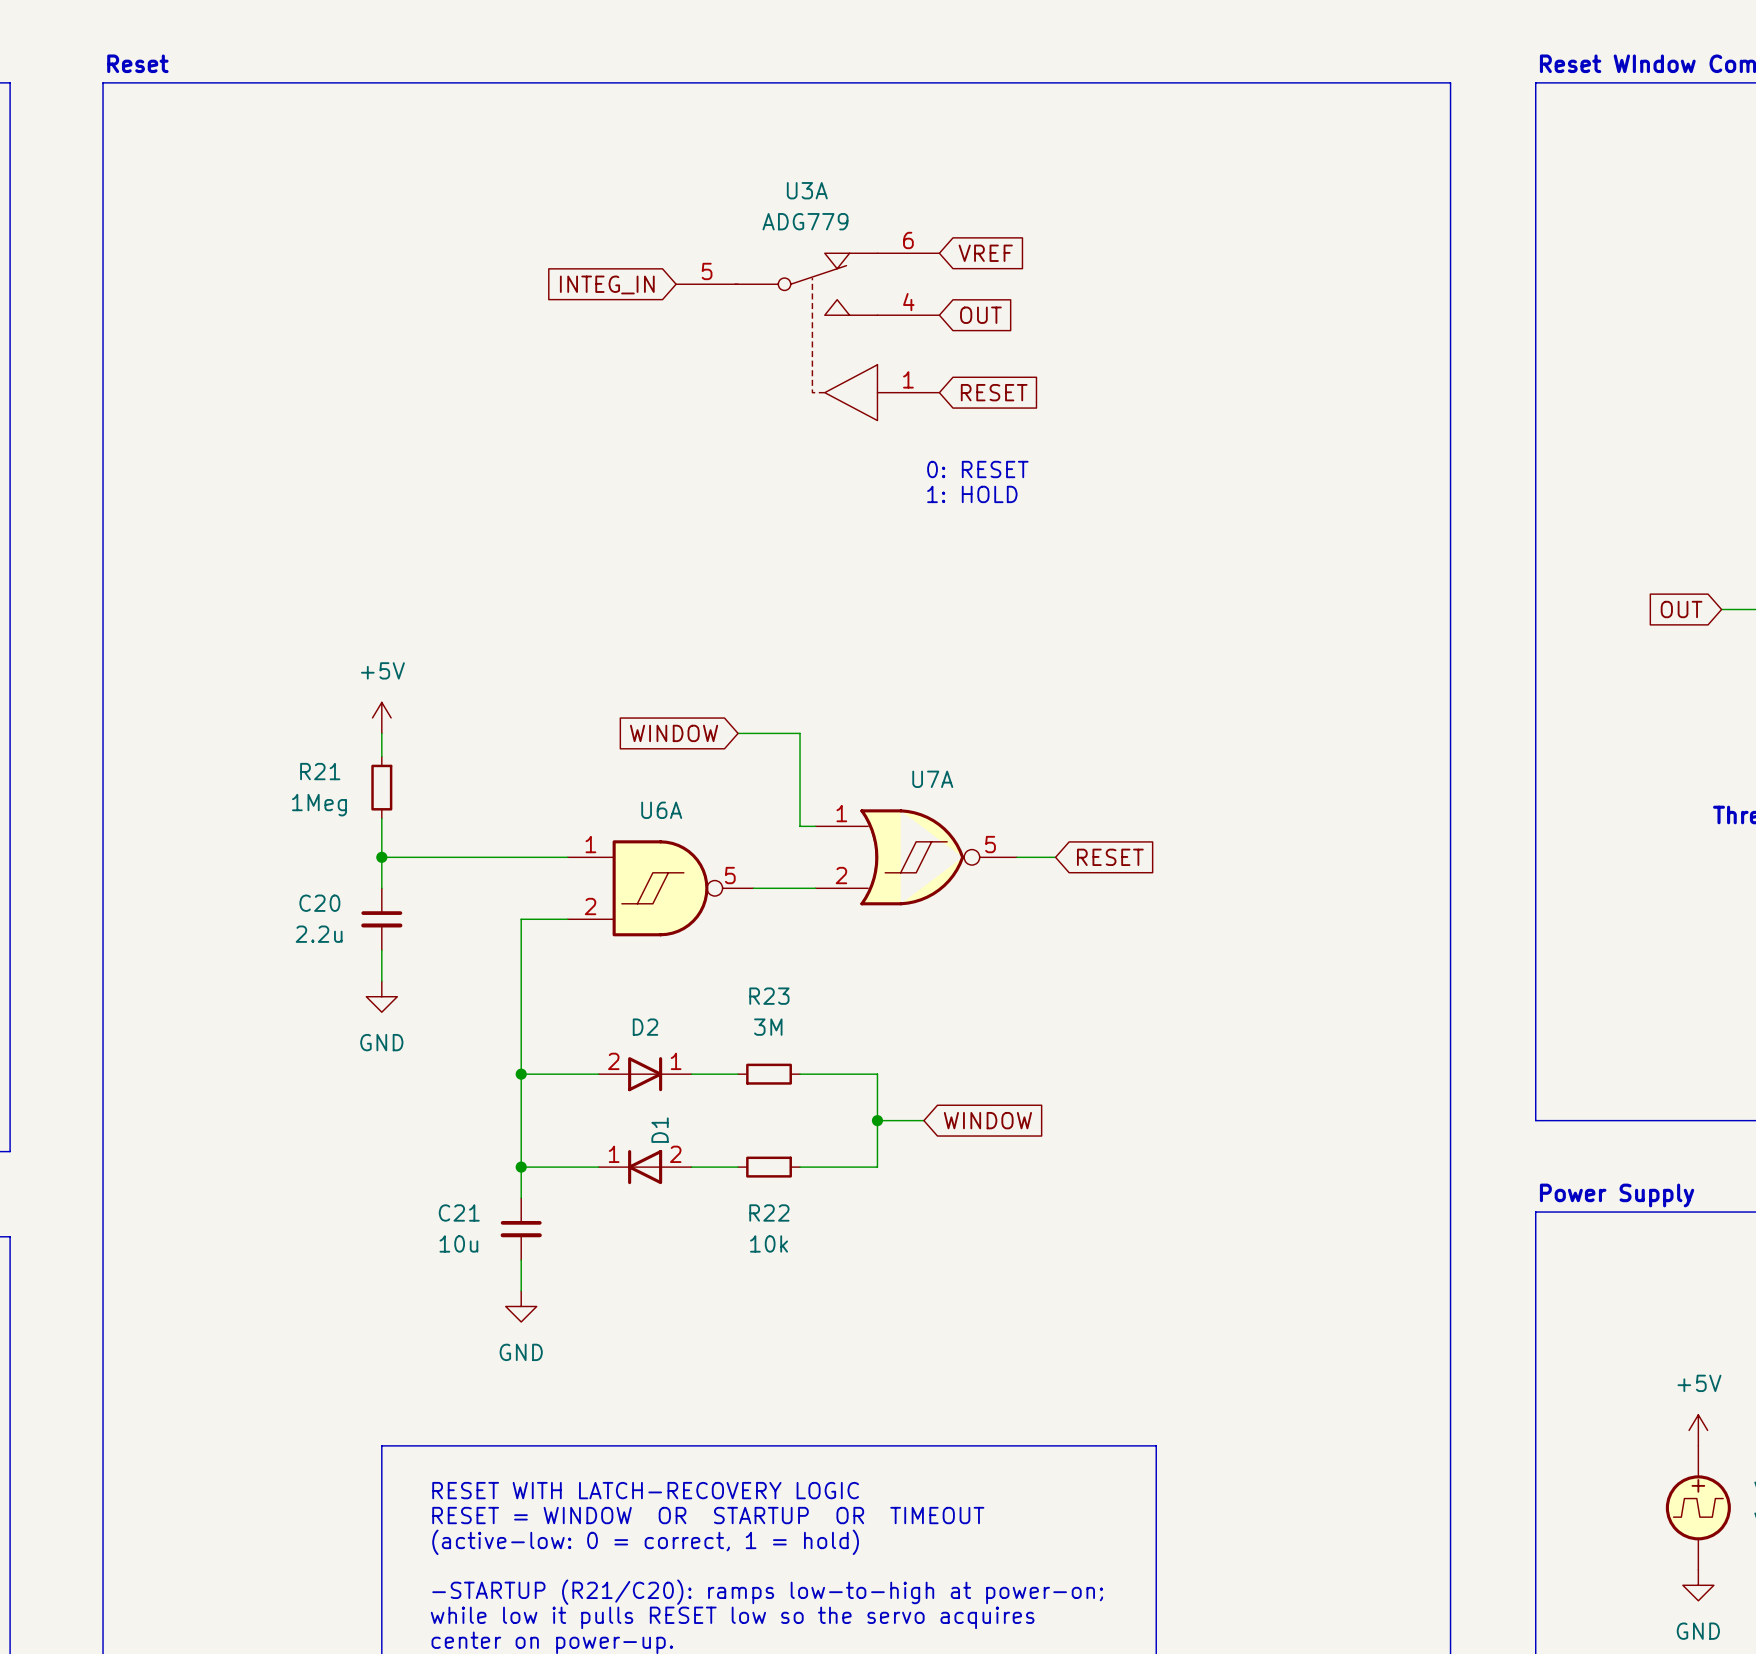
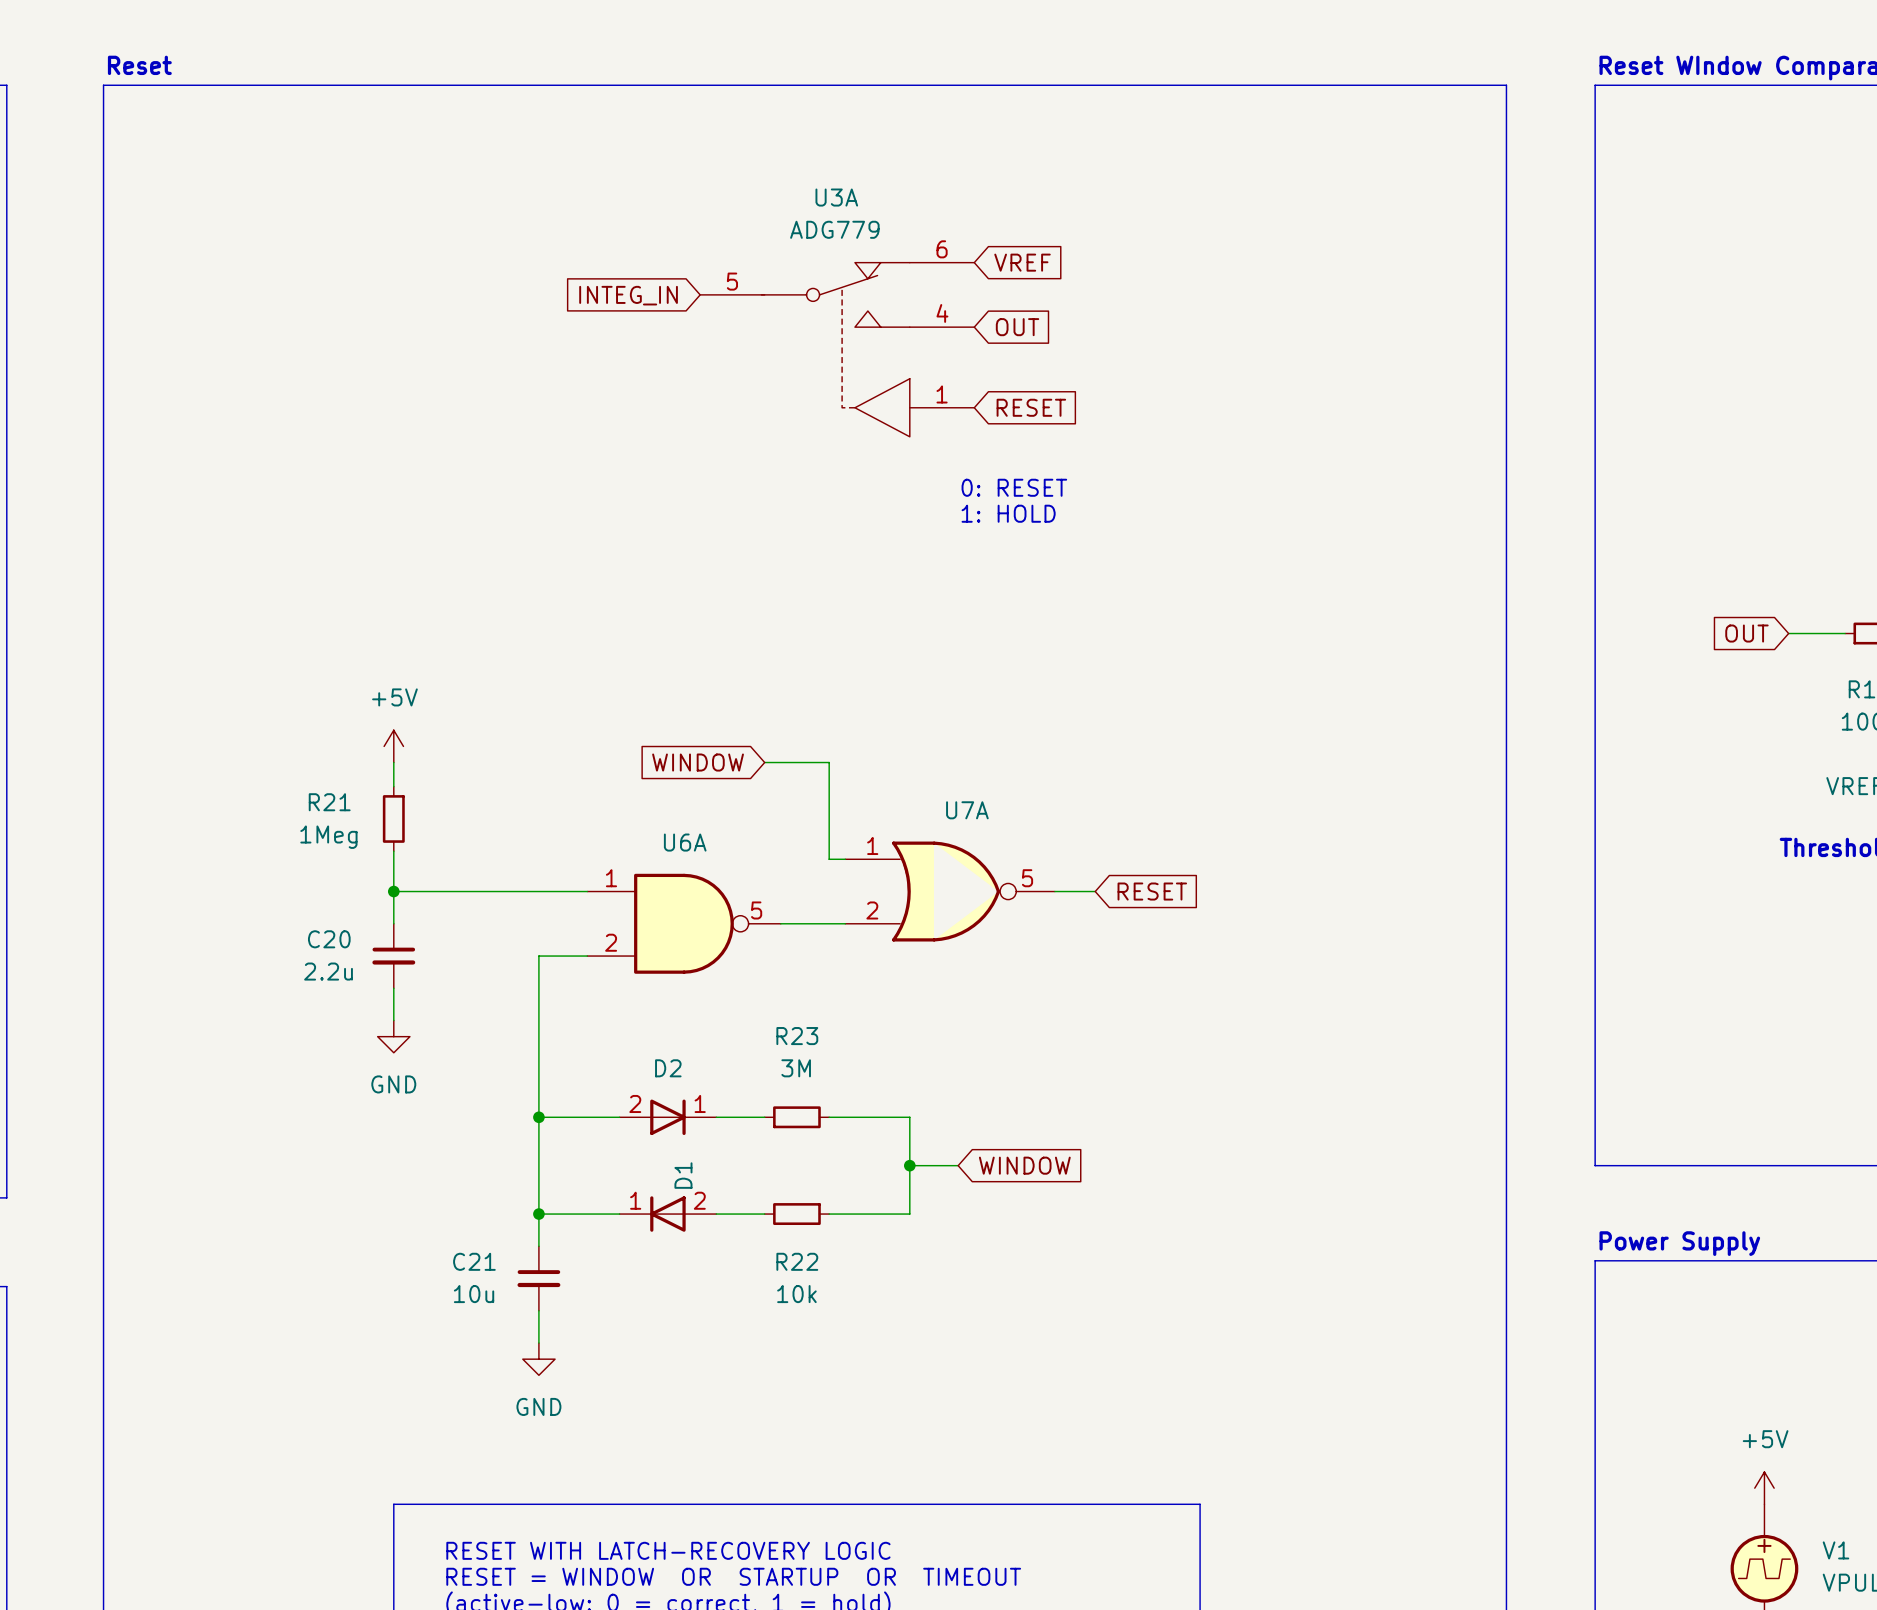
U7A symbol: [815, 809, 1017, 906] -> [845, 841, 1055, 942]
U6A symbol: [567, 840, 754, 937] -> [587, 873, 781, 974]

